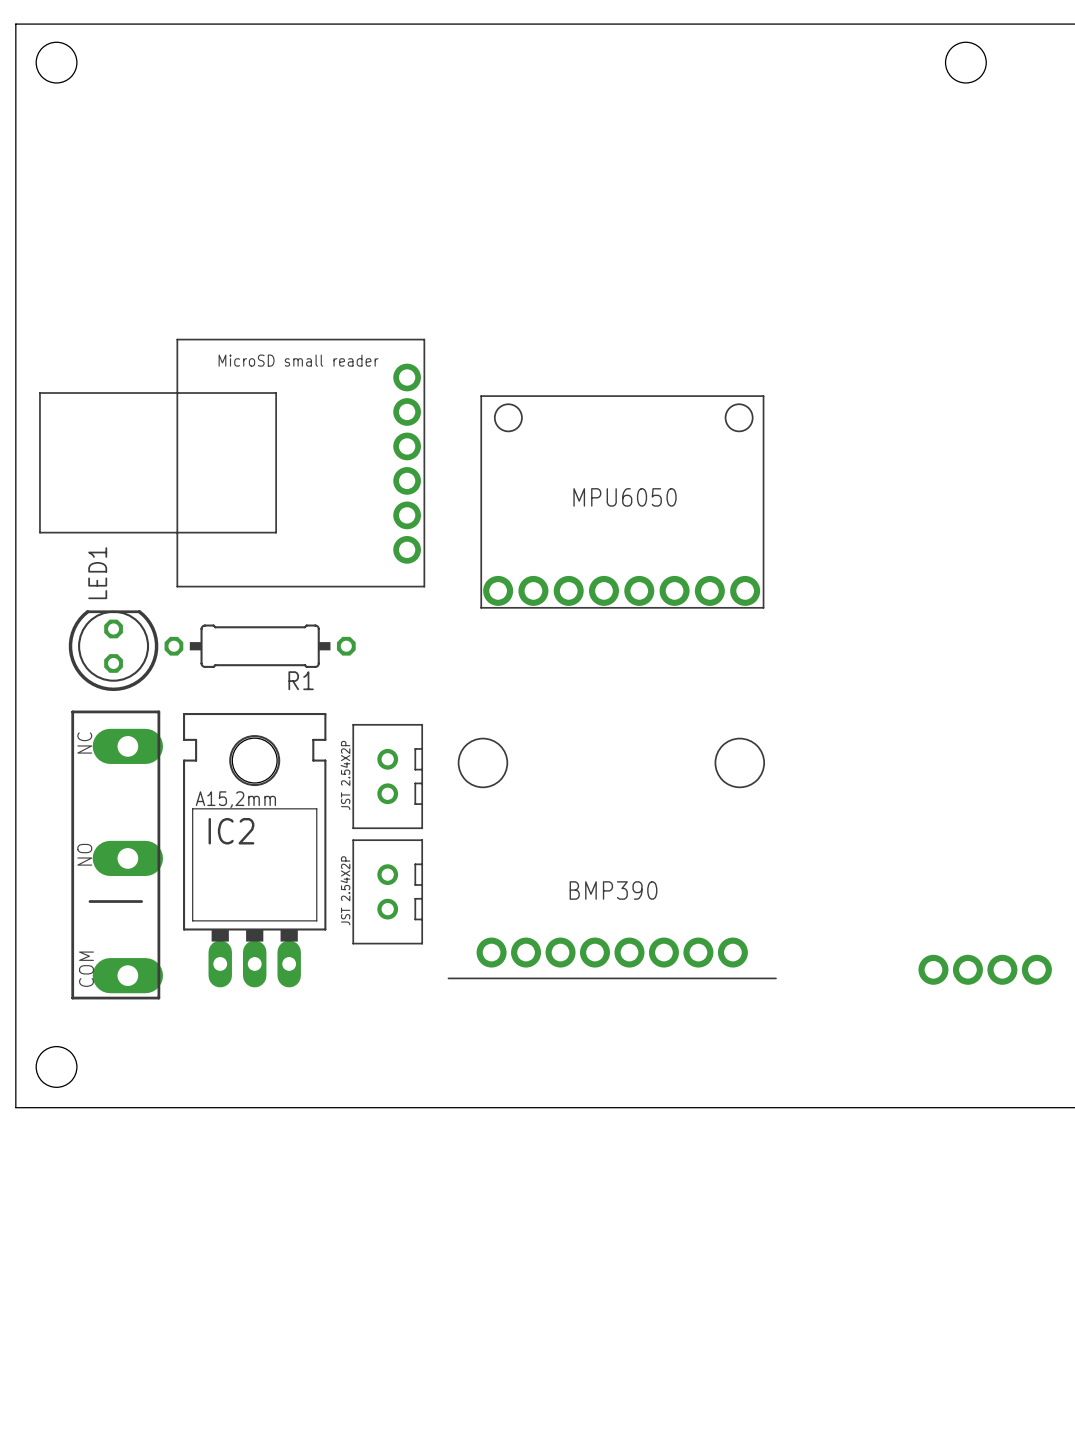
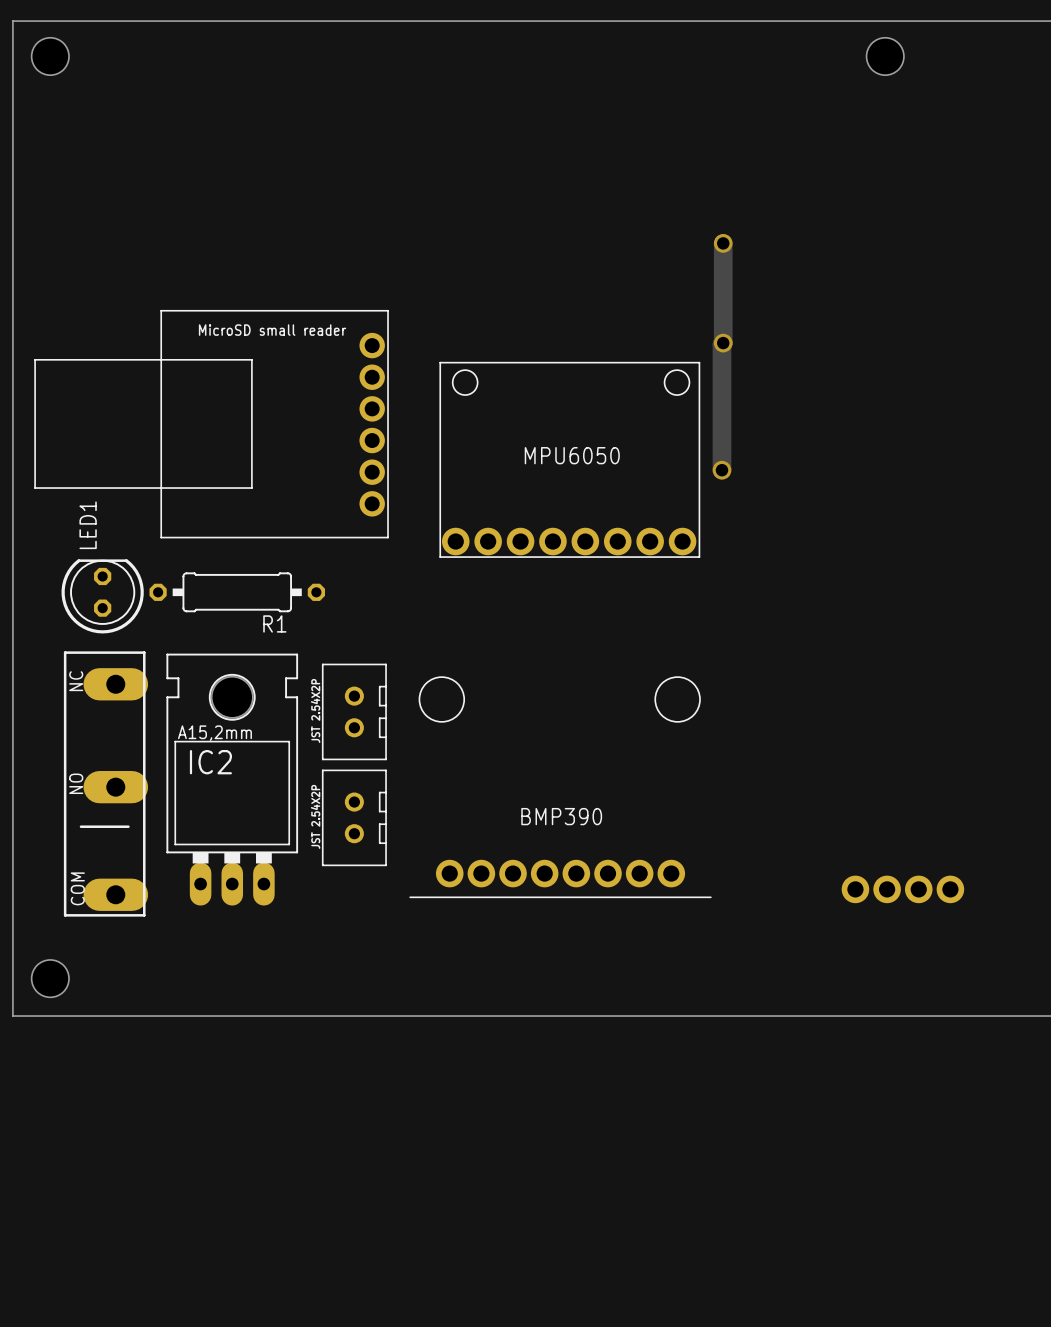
track: none -> (723, 243) (721, 470)
via: none -> (723, 243)
via: none -> (723, 343)
via: none -> (721, 470)

